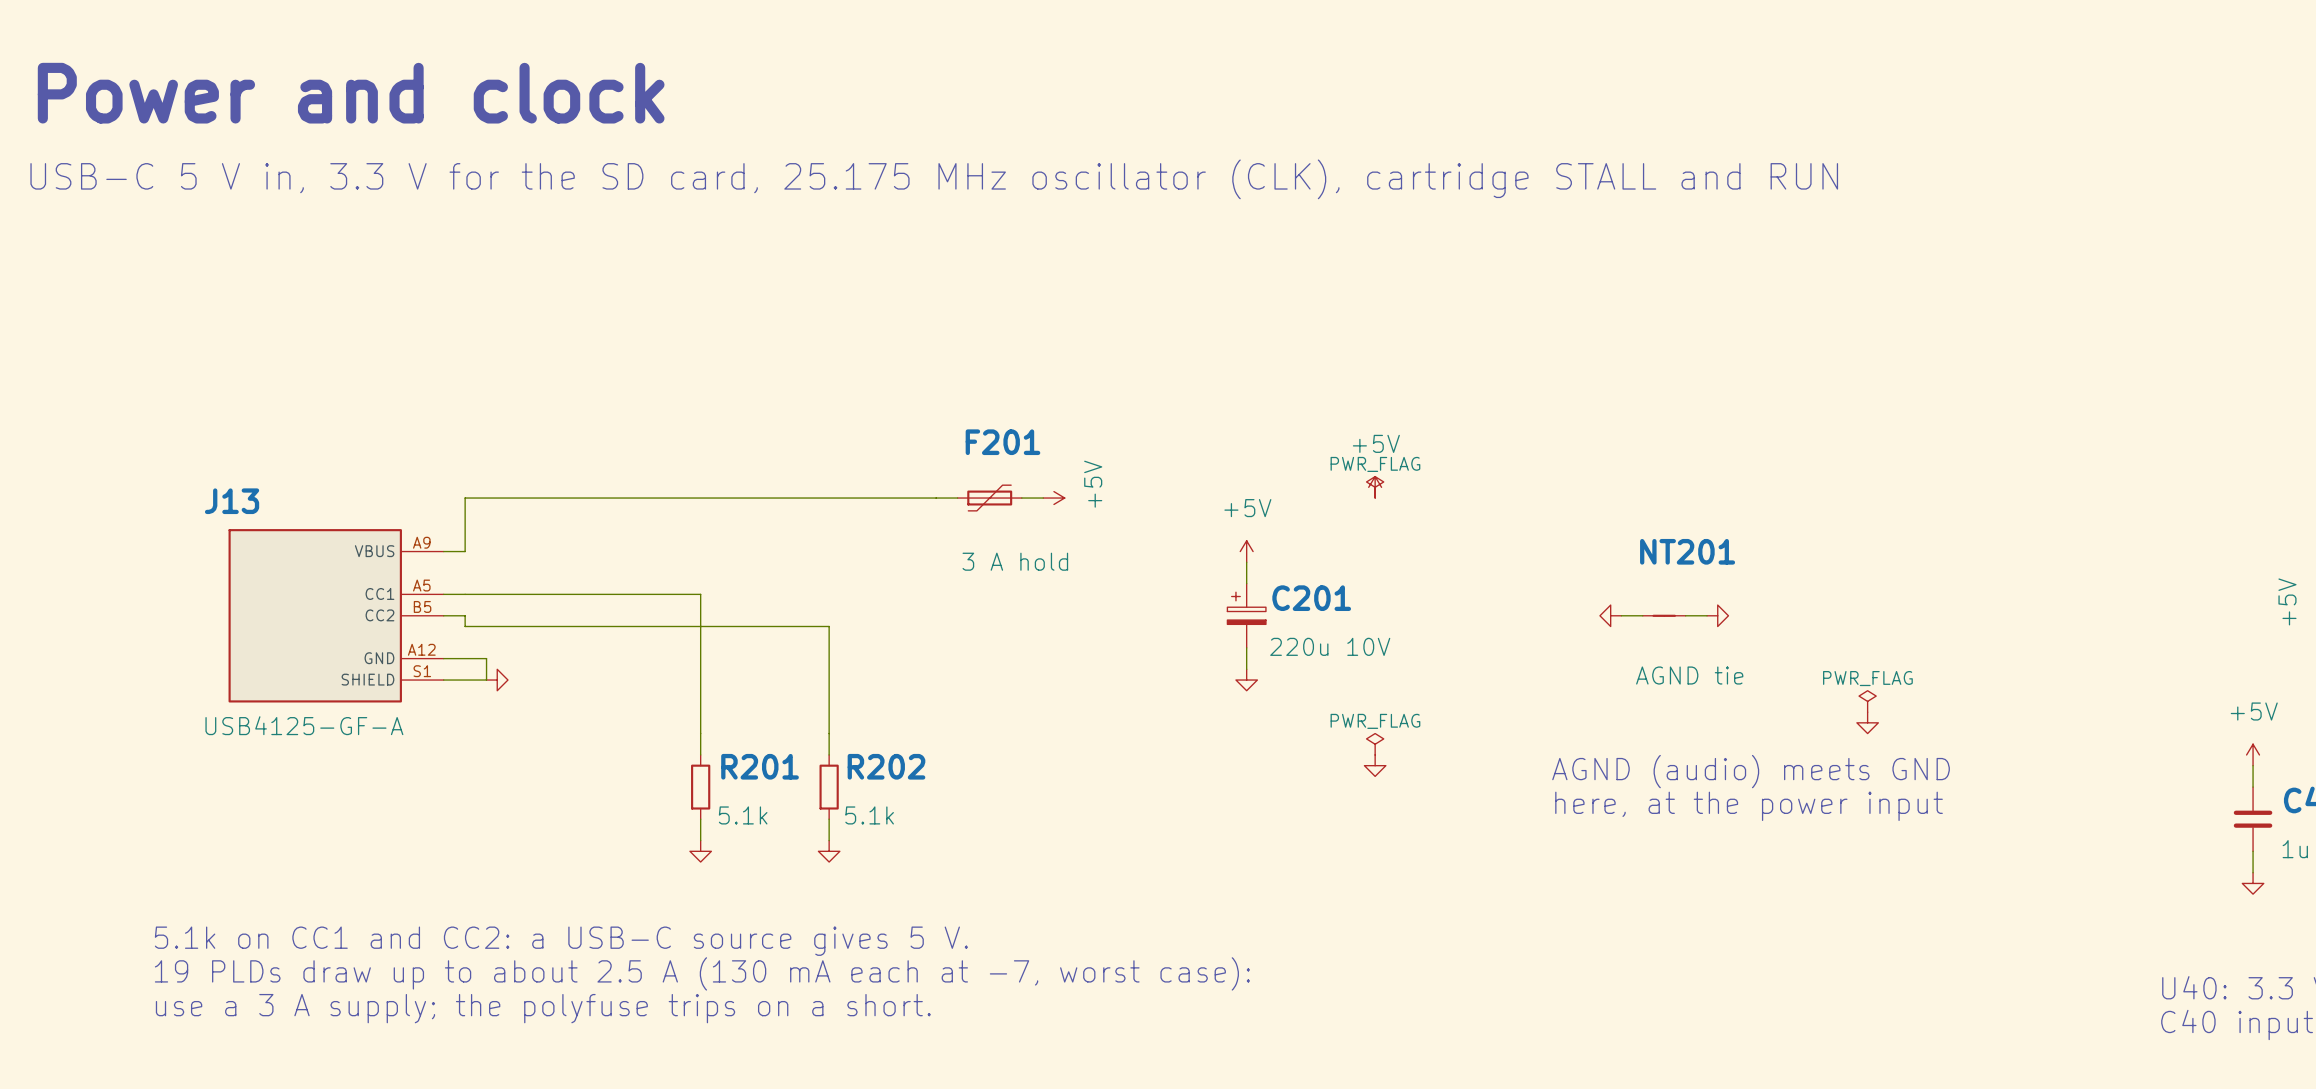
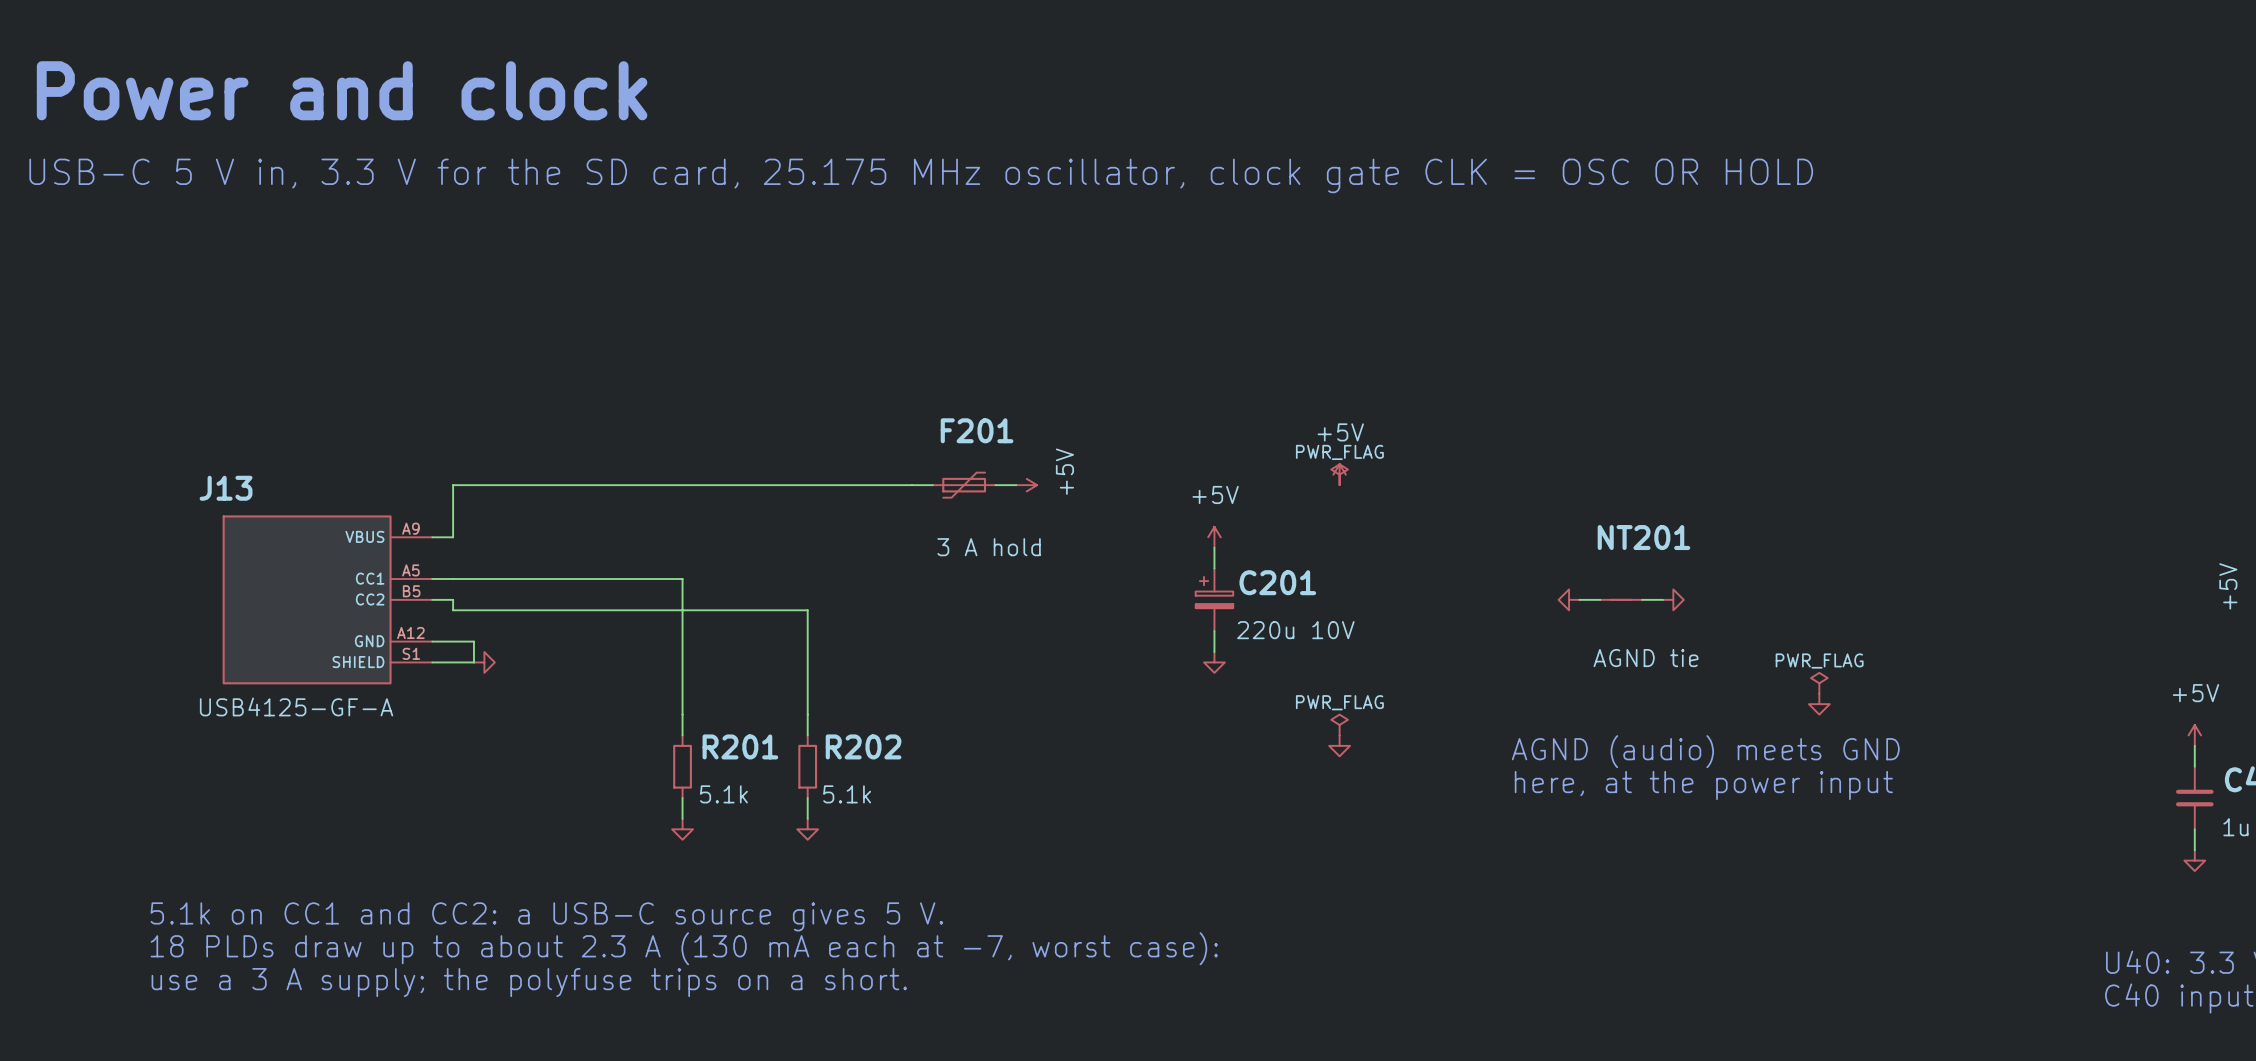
text: USB-C 5 V in, 3.3 V for the SD card, 25.175 MHz oscillator (CLK), cartridge STALL and RUN (934, 179) -> USB-C 5 V in, 3.3 V for the SD card, 25.175 MHz oscillator, clock gate CLK = OSC OR HOLD (921, 175)
text: 19 PLDs draw up to about 2.5 A (130 mA each at -7, worst case): (702, 973) -> 18 PLDs draw up to about 2.3 A (130 mA each at -7, worst case): (684, 948)

